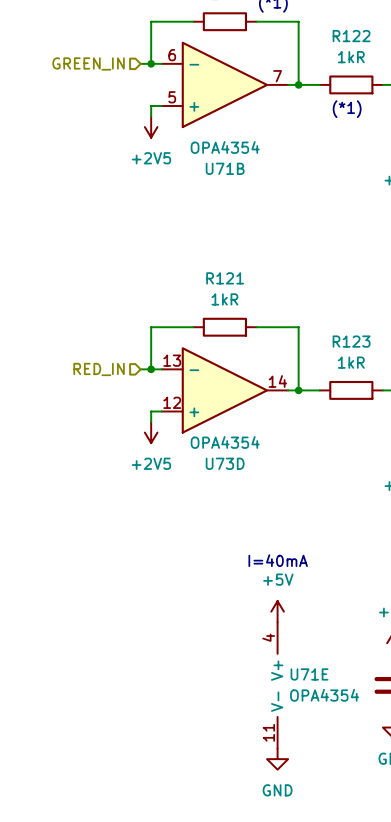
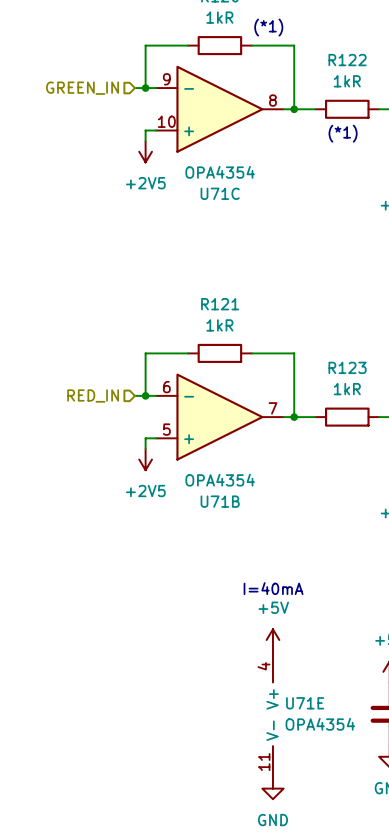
U71B position: (224, 84) -> (219, 417)
U71C: none -> OPA4354 (219, 109)
U73D: OPA4354 (224, 390) -> none

